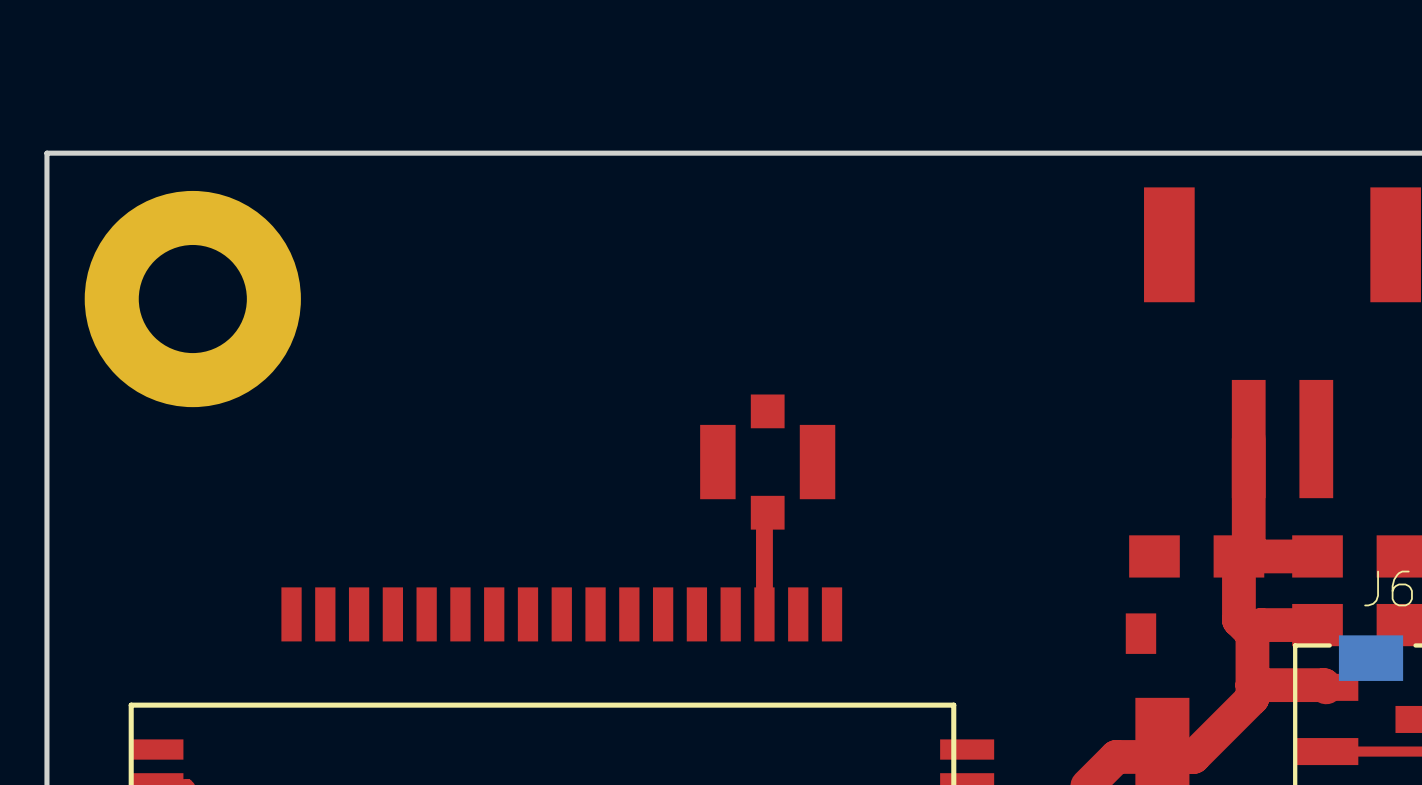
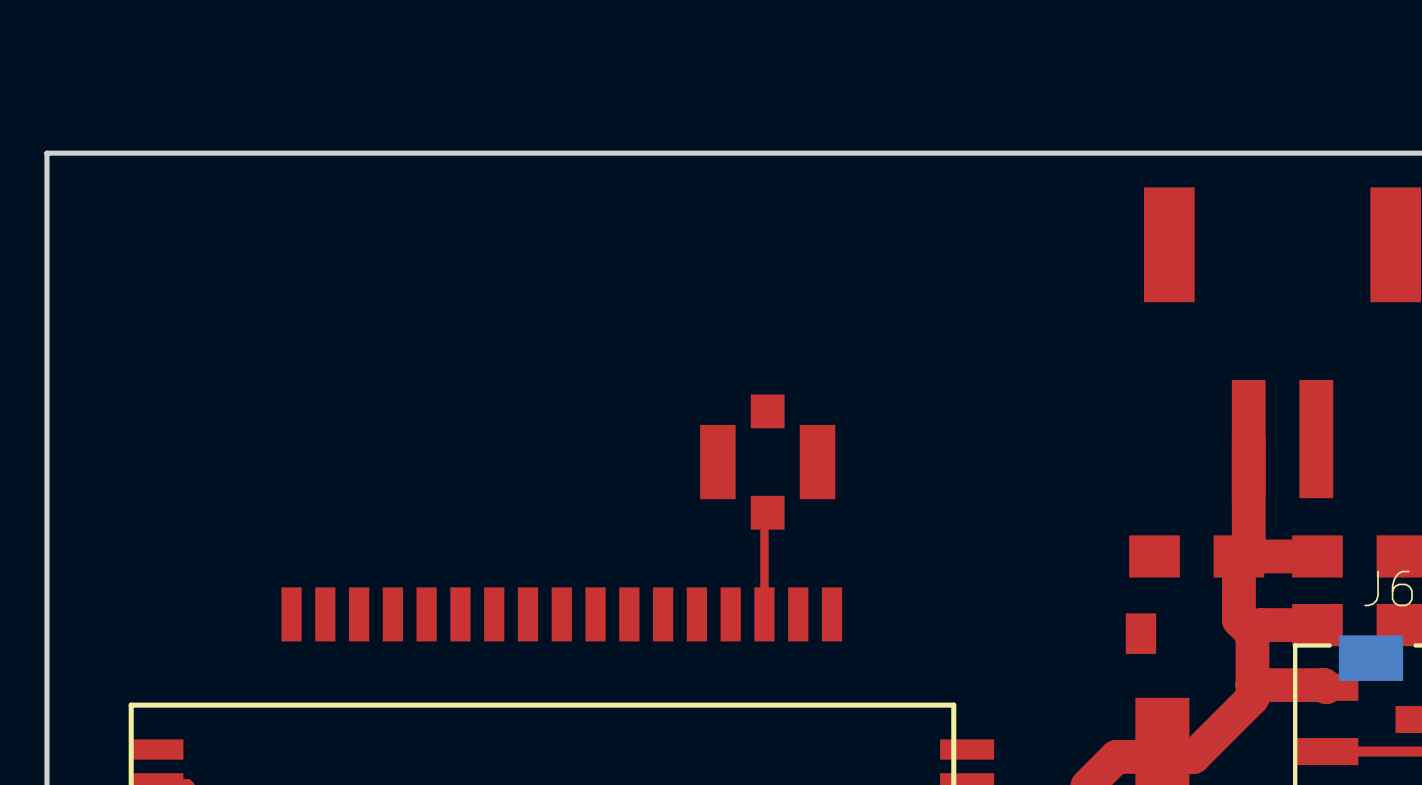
part: (192, 299) -> none
top track width: thick (764, 515) (764, 614) -> thin (764, 515) (764, 614)

